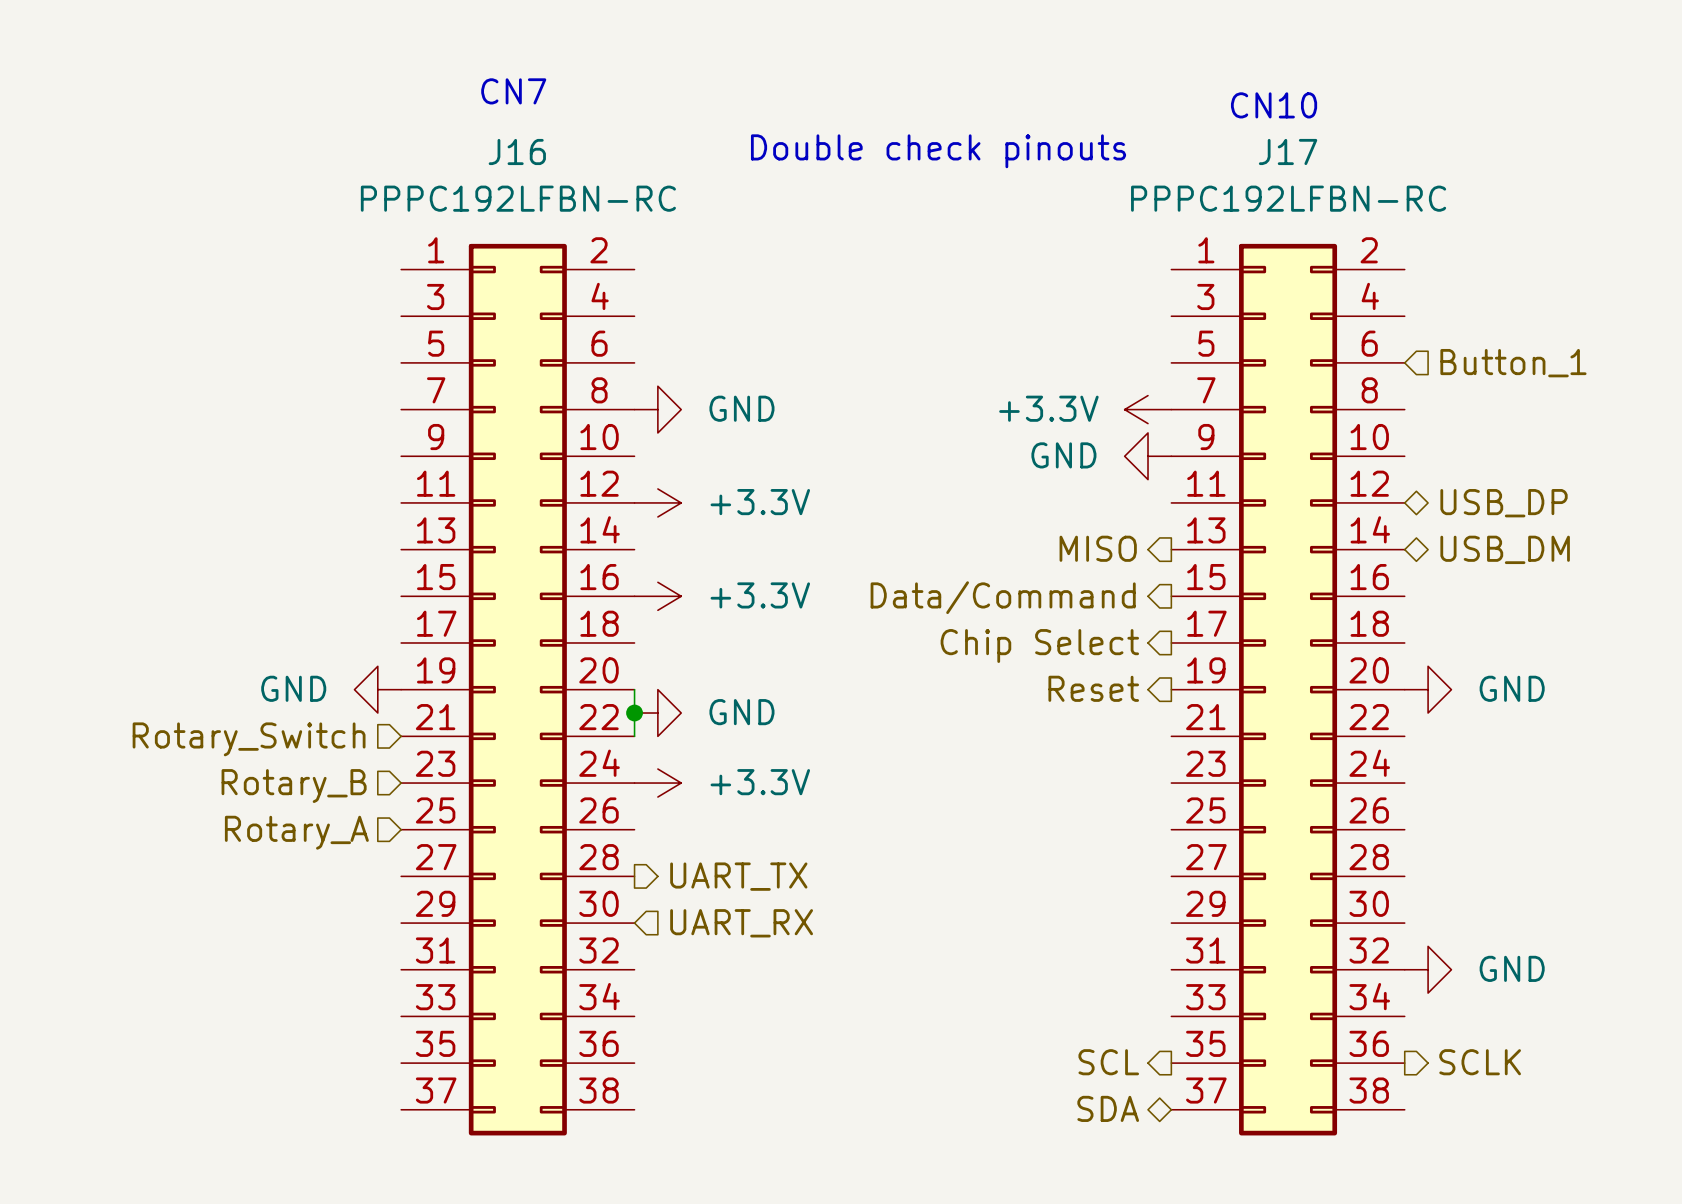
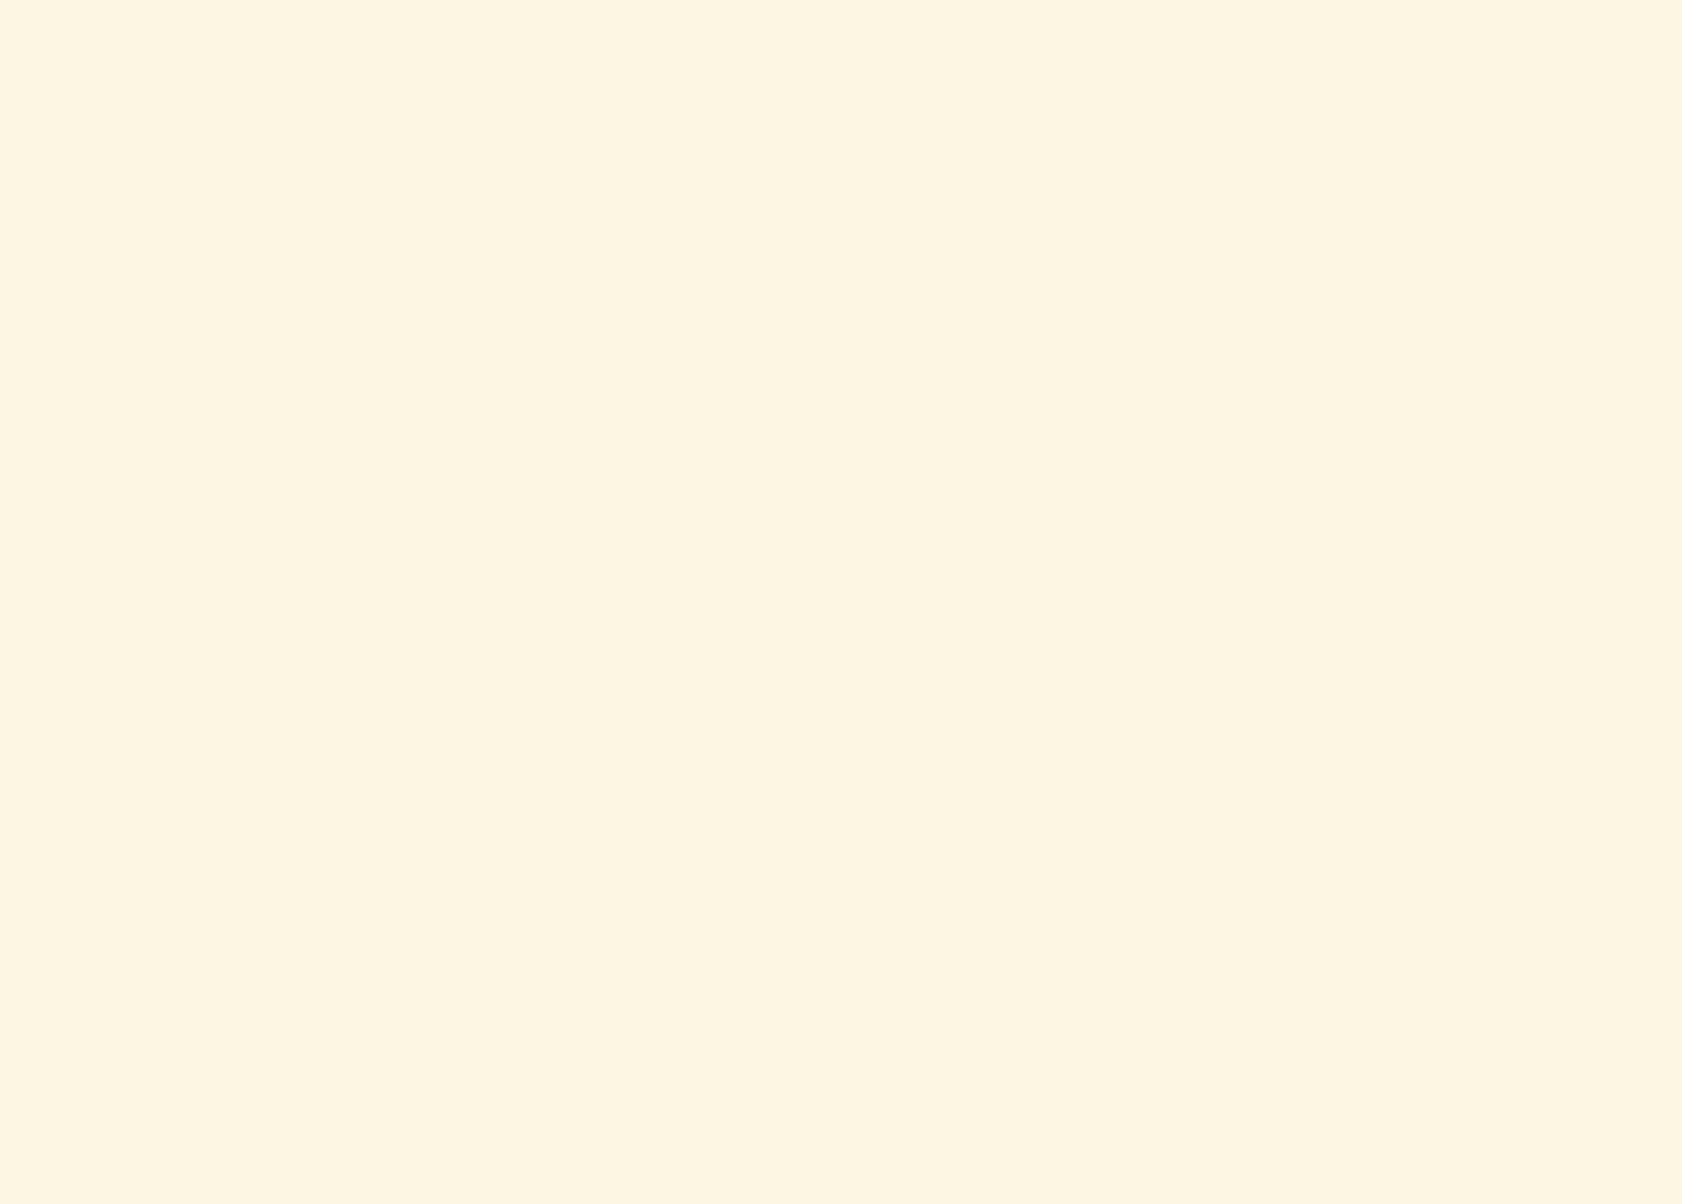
text: CN7 (513, 91) -> none
text: CN10 (1274, 105) -> none
text: Double check pinouts (938, 151) -> none
hierarchical label: Button_1 (1513, 363) -> none
power symbol: GND (657, 409) -> none
power symbol: +3.3V (1148, 409) -> none
power symbol: GND (1148, 456) -> none
power symbol: +3.3V (657, 502) -> none
hierarchical label: USB_DP (1504, 503) -> none
hierarchical label: MISO (1098, 548) -> none
hierarchical label: USB_DM (1505, 549) -> none
power symbol: +3.3V (657, 596) -> none
hierarchical label: Data/Command (1003, 597) -> none
hierarchical label: Chip Select (1039, 646) -> none
hierarchical label: Reset (1093, 688) -> none
power symbol: GND (377, 689) -> none
J16: PPPC192LFBN-RC (517, 689) -> none
wire: (634, 689) (634, 736) -> none
J17: PPPC192LFBN-RC (1288, 689) -> none
power symbol: GND (1428, 689) -> none
junction: (634, 713) -> none
power symbol: GND (657, 713) -> none
hierarchical label: Rotary_Switch (249, 739) -> none
power symbol: +3.3V (657, 783) -> none
hierarchical label: Rotary_B (294, 786) -> none
hierarchical label: Rotary_A (296, 832) -> none
hierarchical label: UART_TX (738, 876) -> none
hierarchical label: UART_RX (741, 923) -> none
power symbol: GND (1428, 969) -> none
hierarchical label: SCL (1108, 1062) -> none
hierarchical label: SCLK (1480, 1062) -> none
hierarchical label: SDA (1108, 1108) -> none

